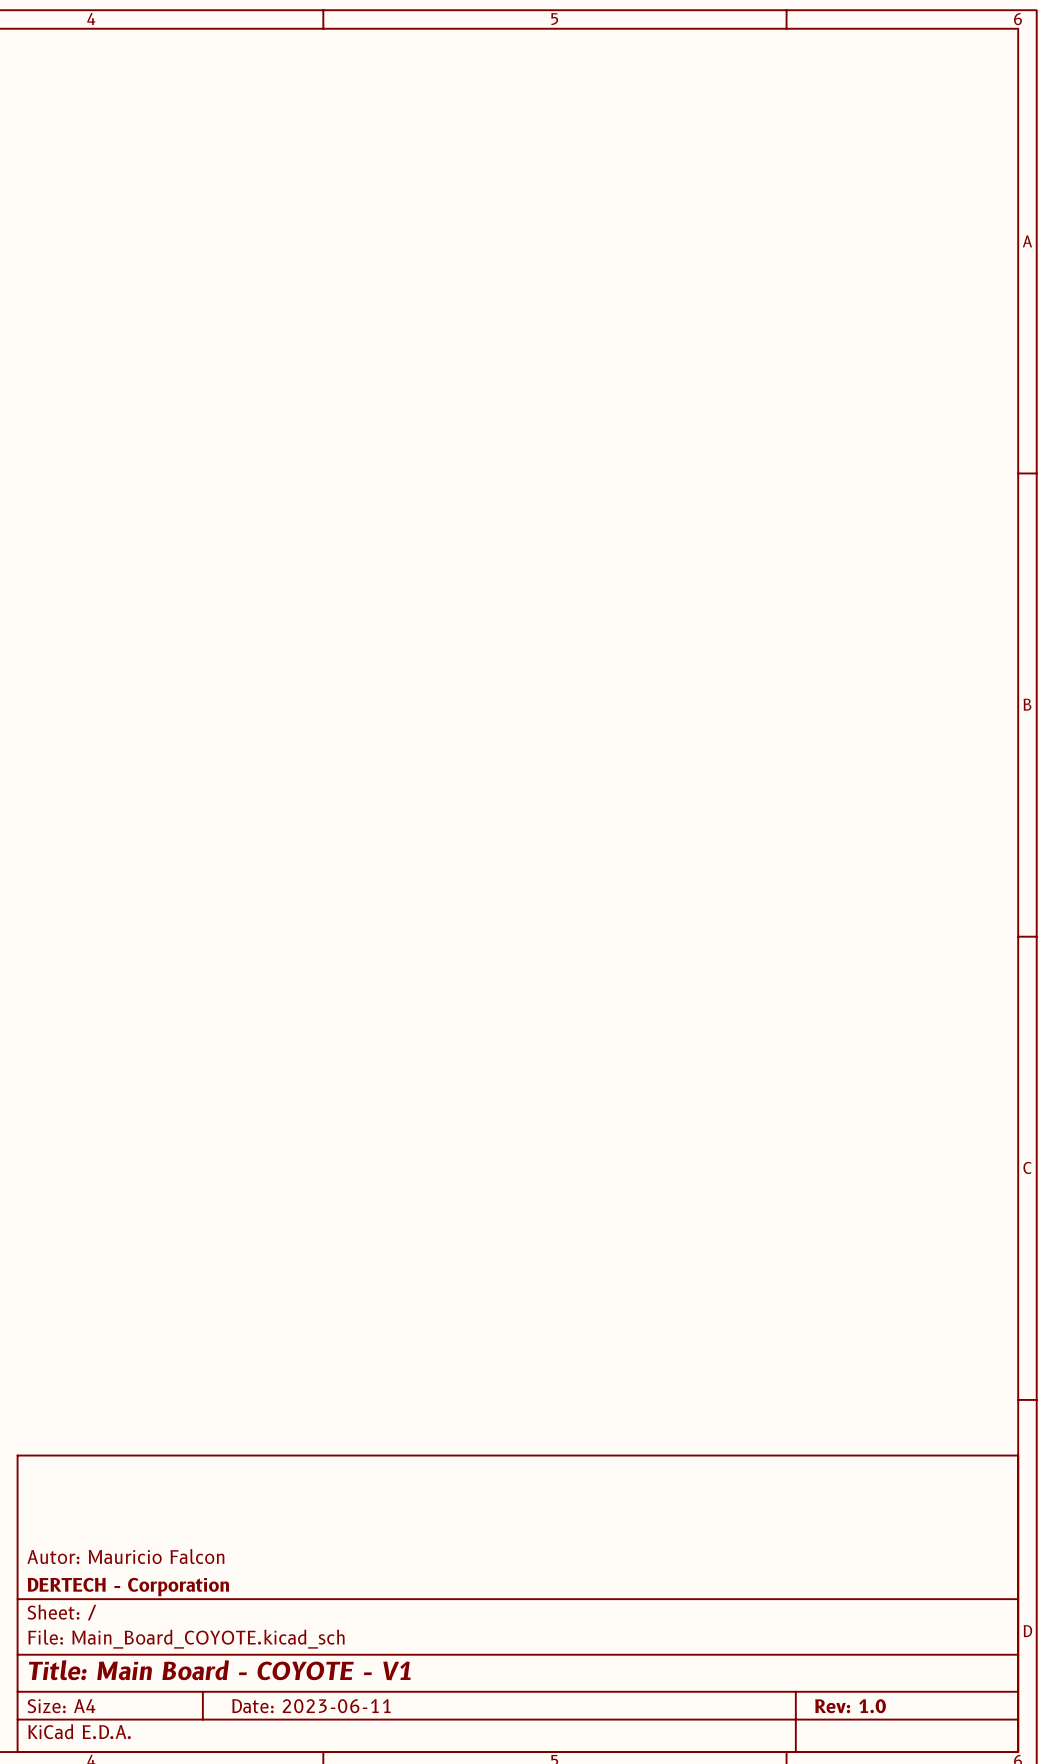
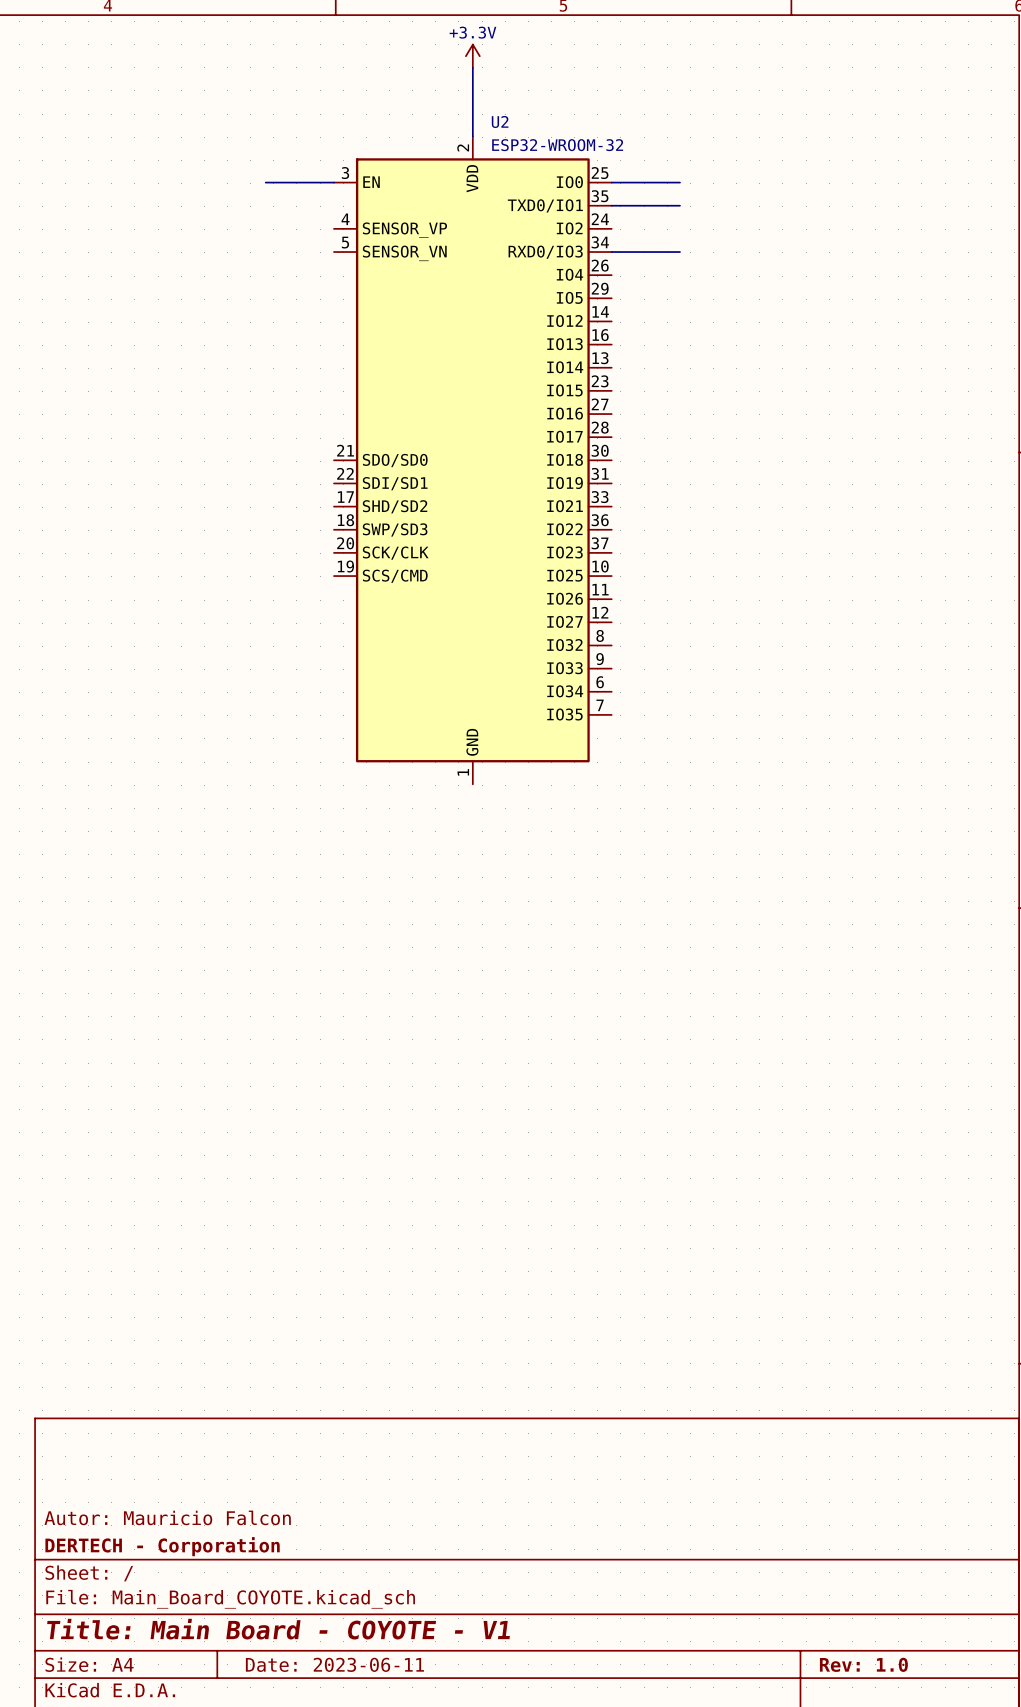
power symbol: none -> +3.3V (472, 56)
wire: none -> (472, 67) (472, 136)
wire: none -> (265, 182) (333, 182)
wire: none -> (611, 182) (679, 182)
wire: none -> (611, 205) (679, 205)
wire: none -> (611, 252) (679, 252)
U2: none -> ESP32-WROOM-32 (472, 460)

